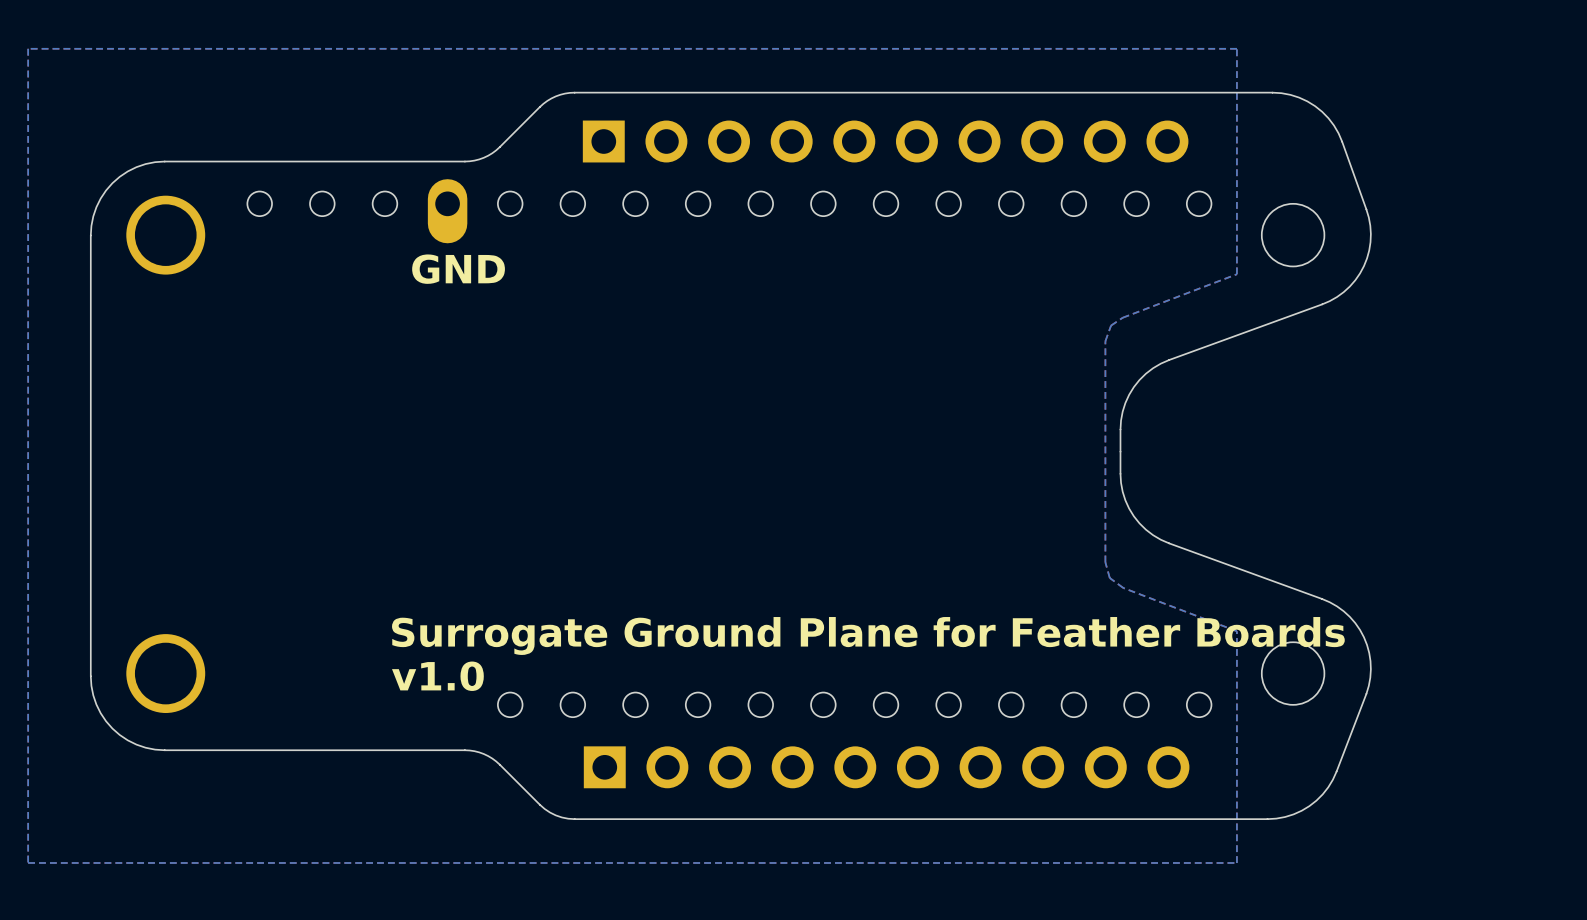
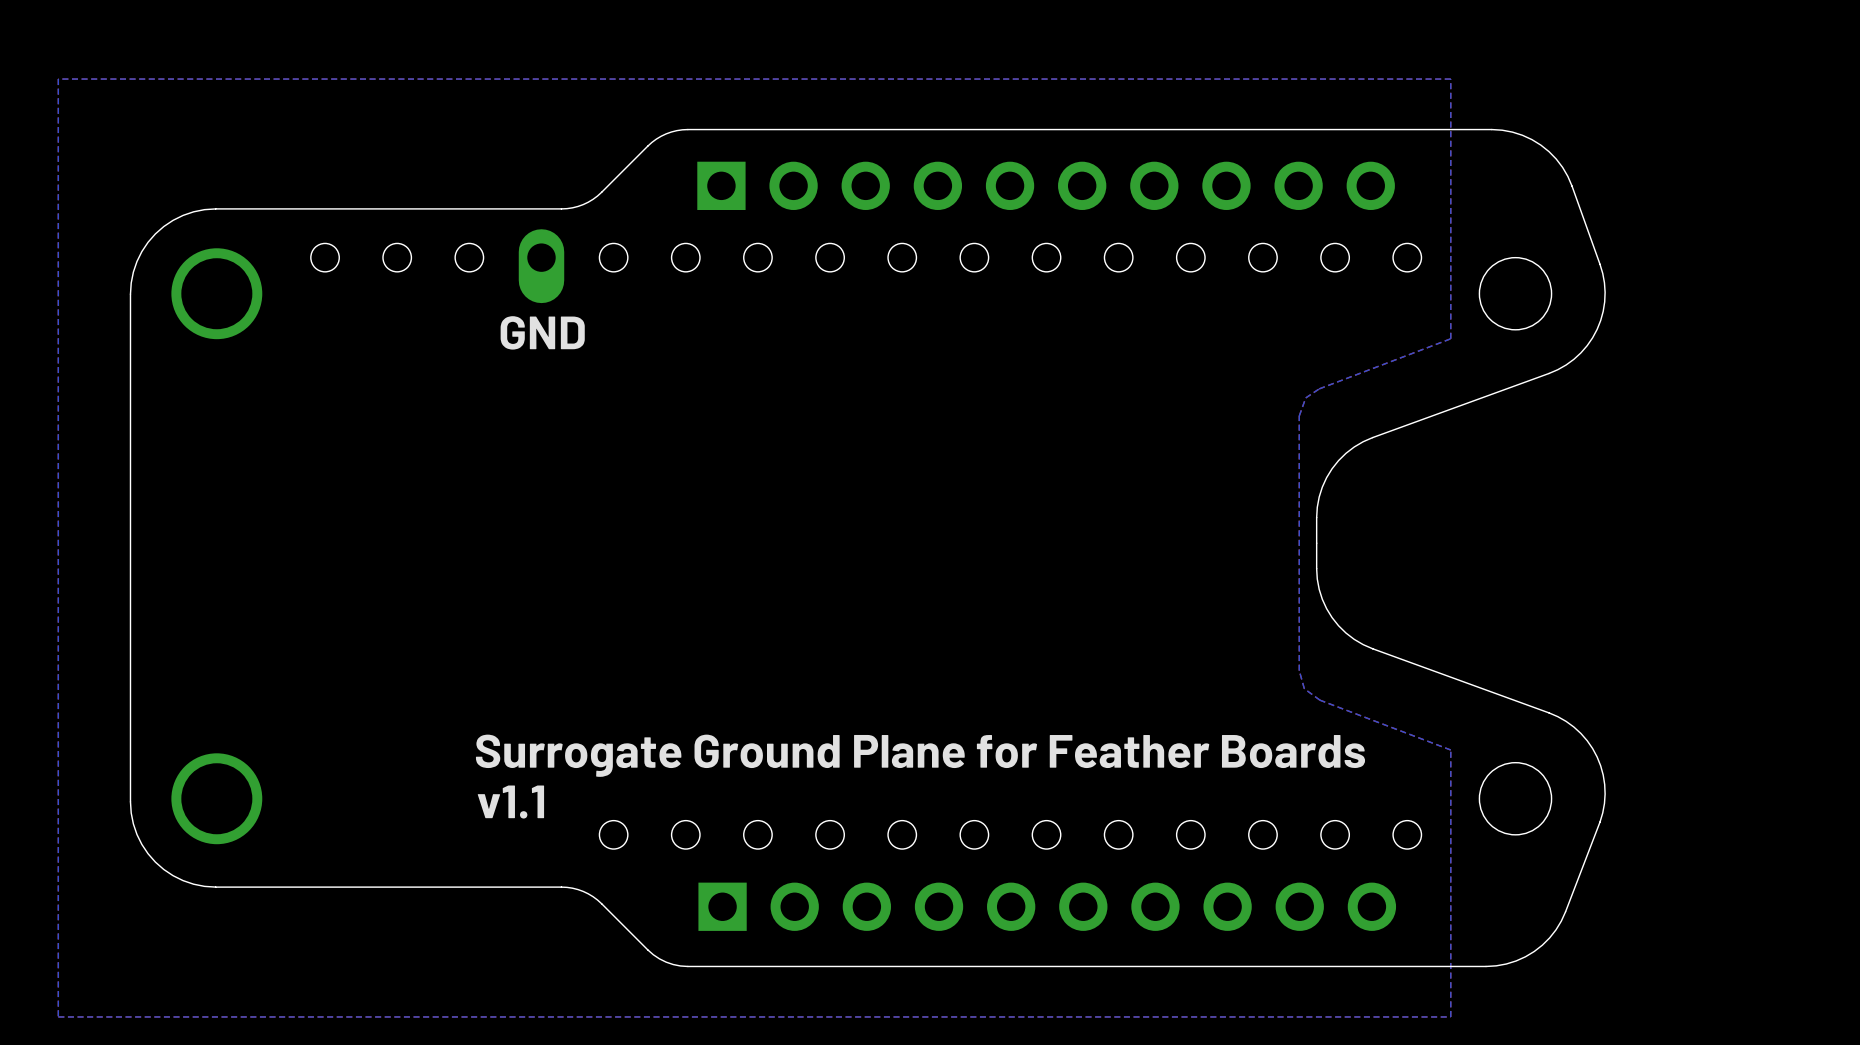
text: v1.0 (437, 676) -> v1.1 (510, 802)

